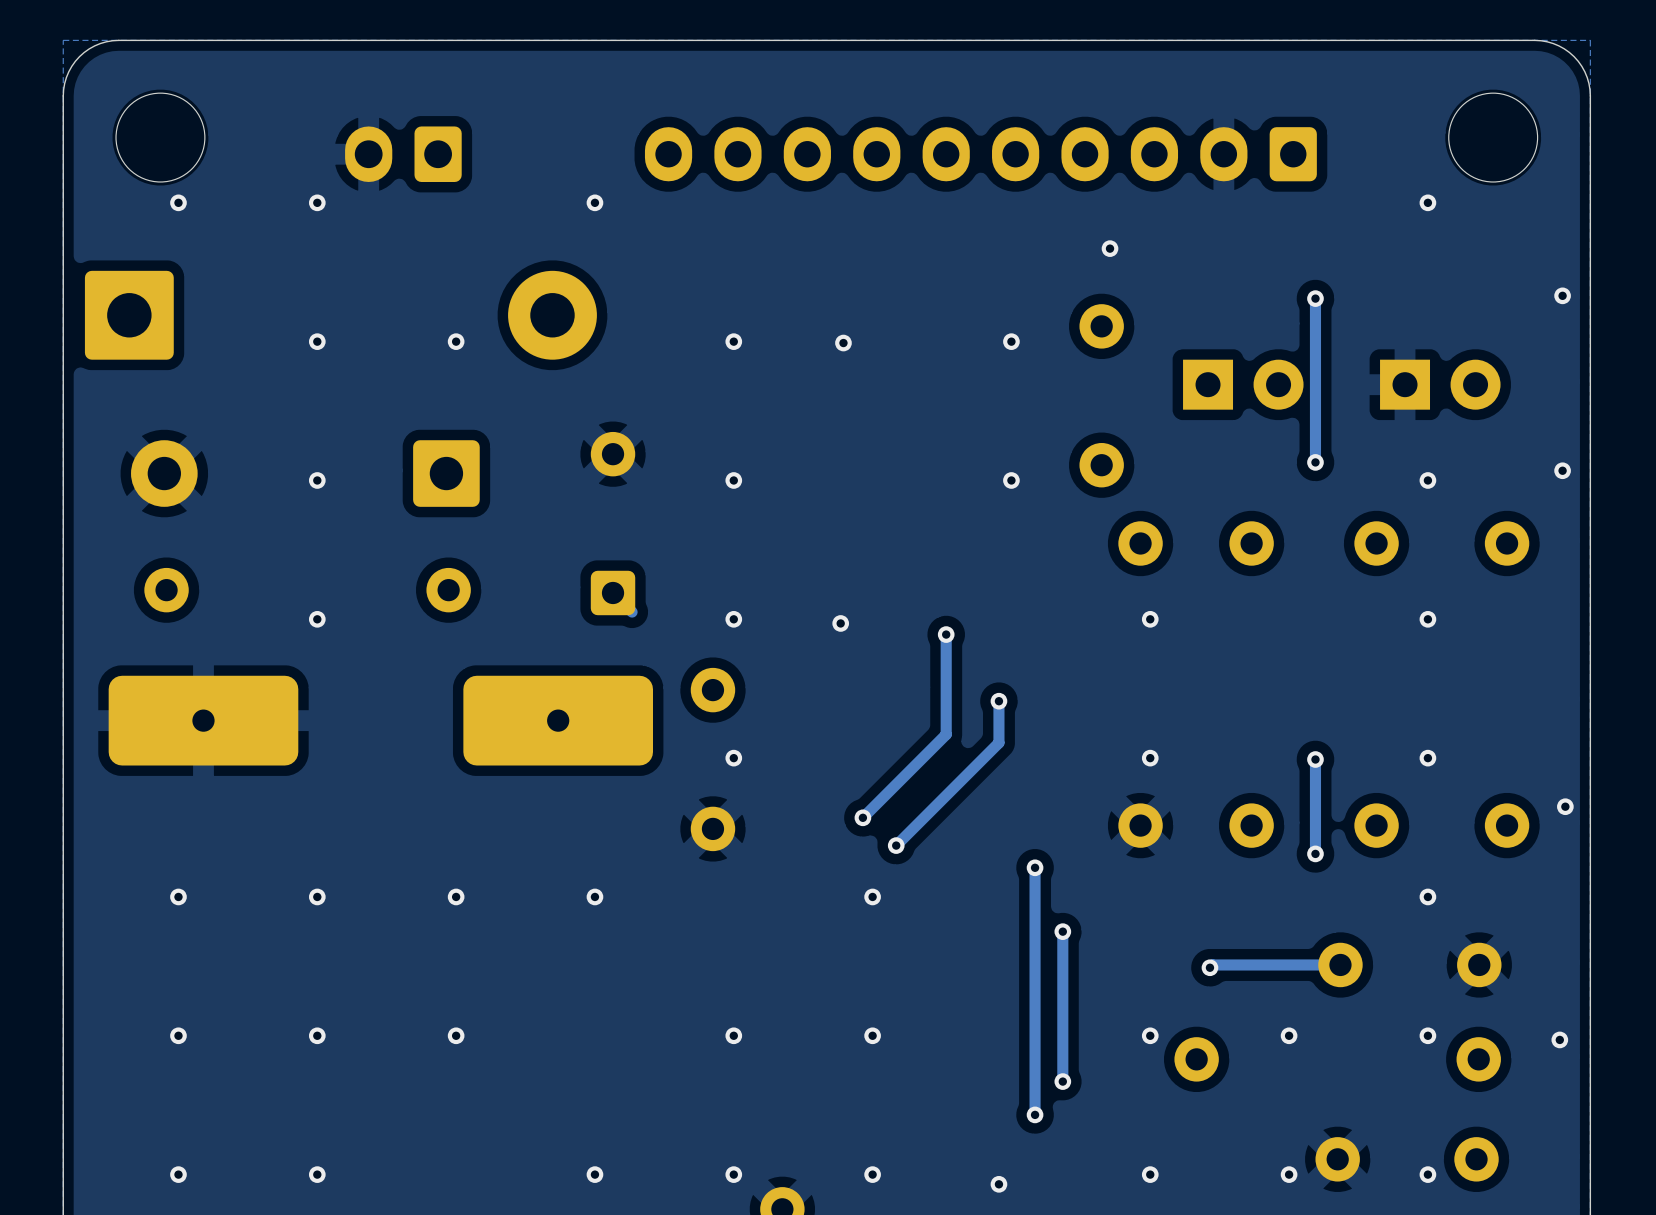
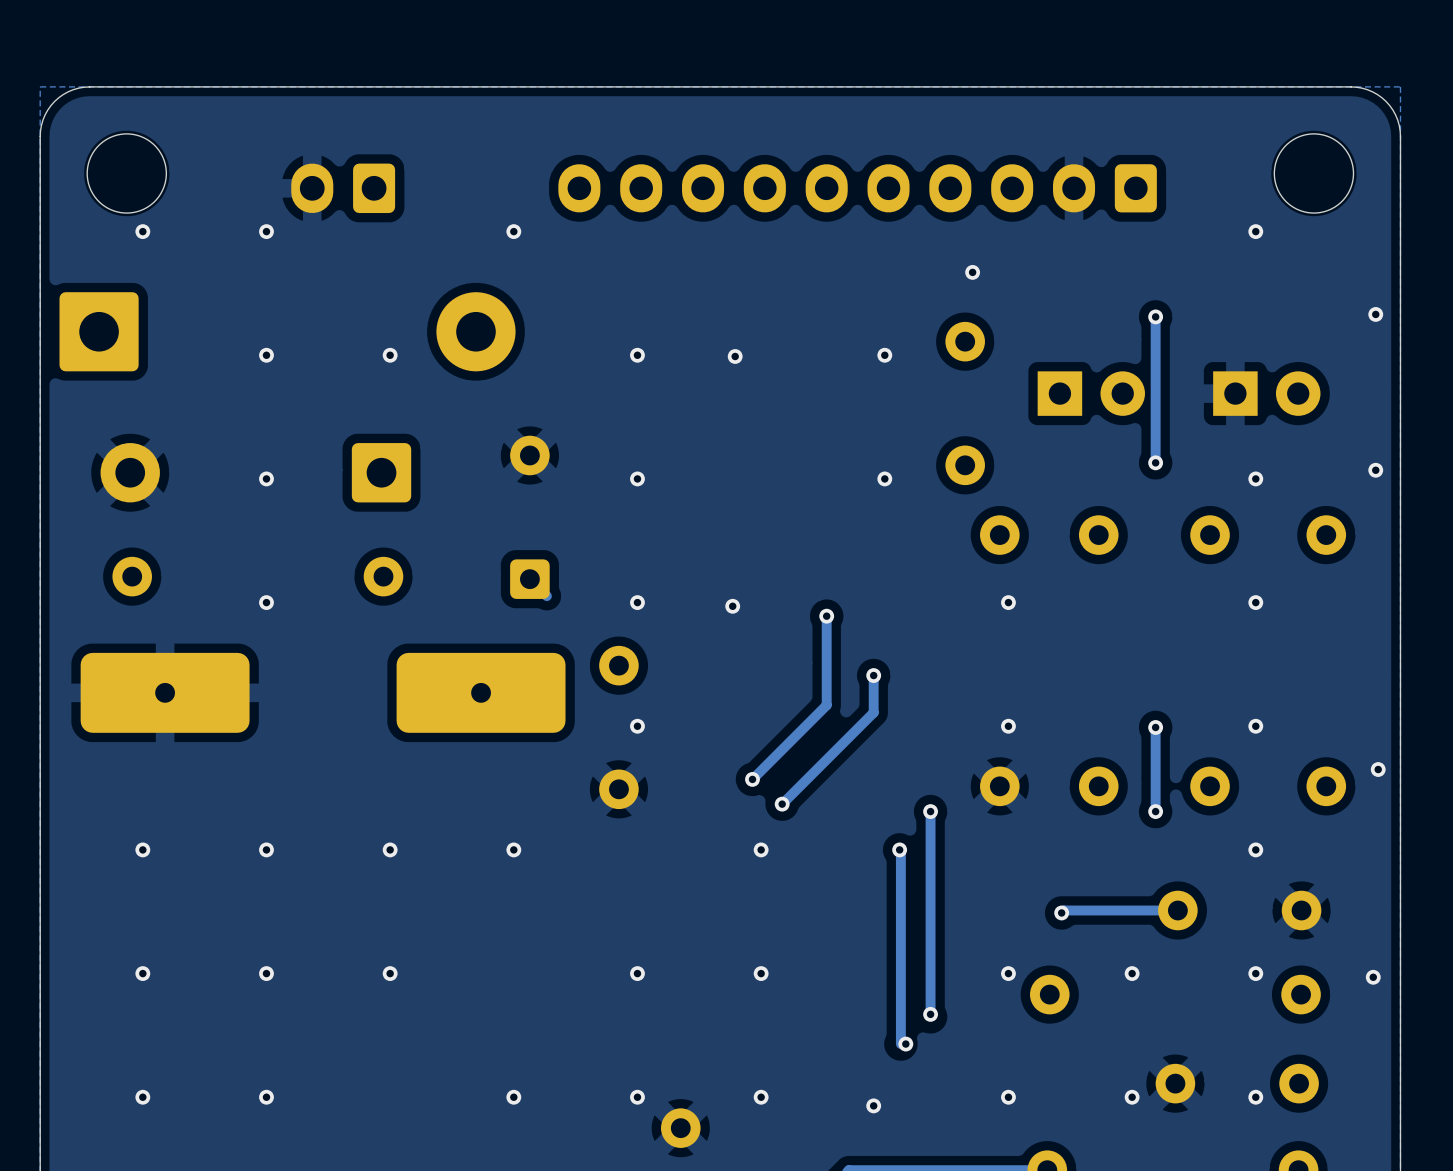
track: none -> (930, 811) (930, 880)
via: none -> (930, 811)
track: (1035, 867) (1035, 1114) -> none
via: (1035, 867) -> none
track: none -> (899, 849) (900, 1044)
via: none -> (899, 849)
via: (1062, 931) -> none

